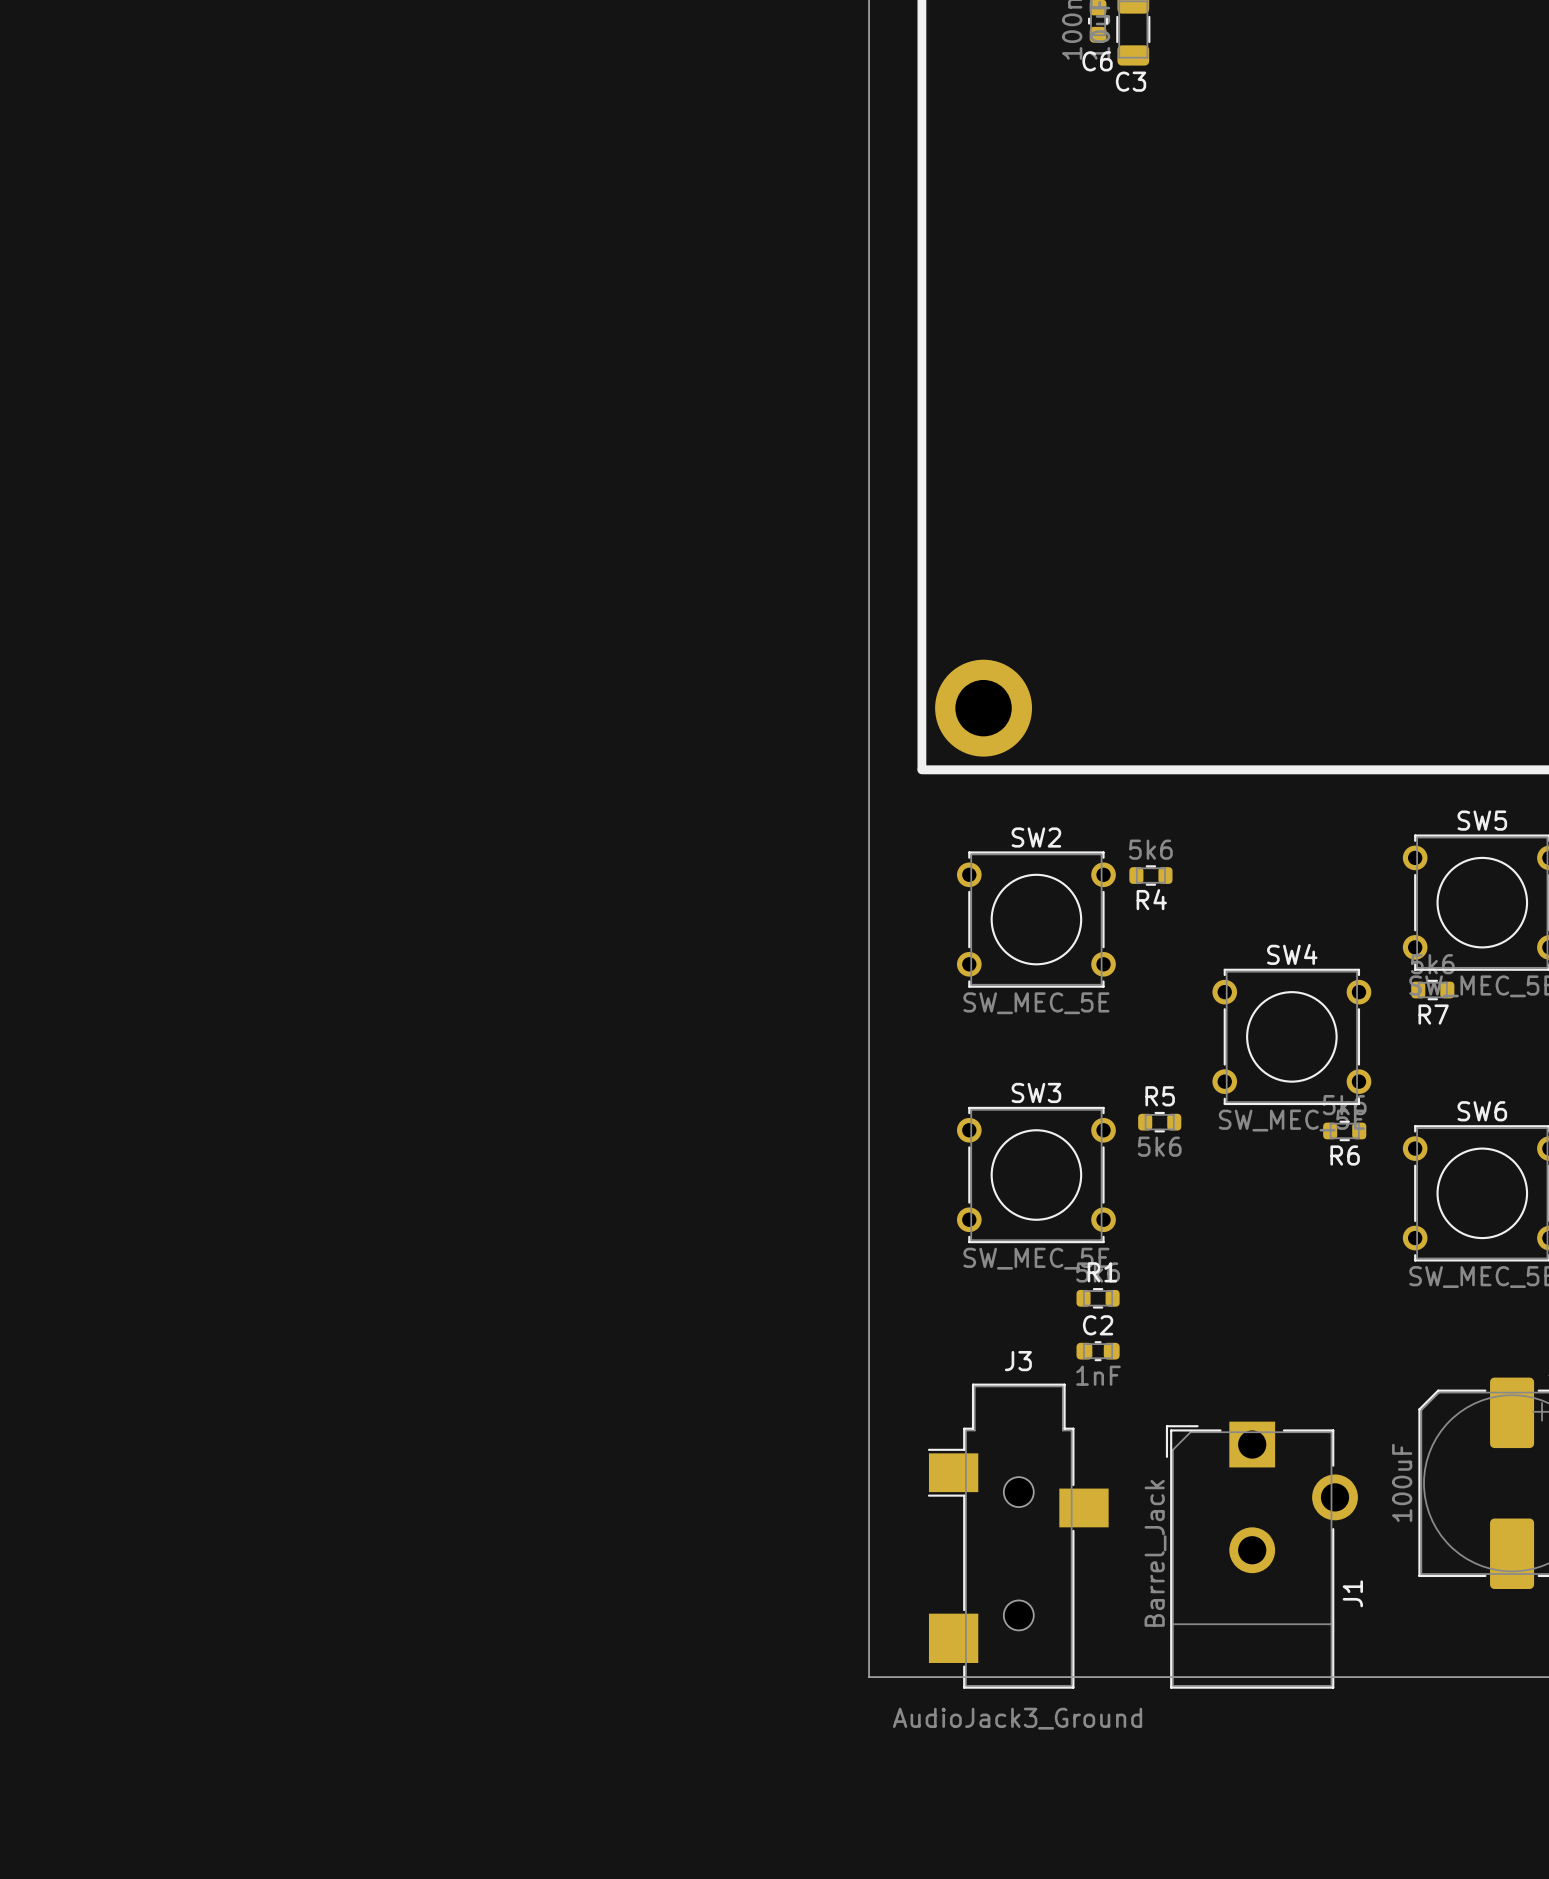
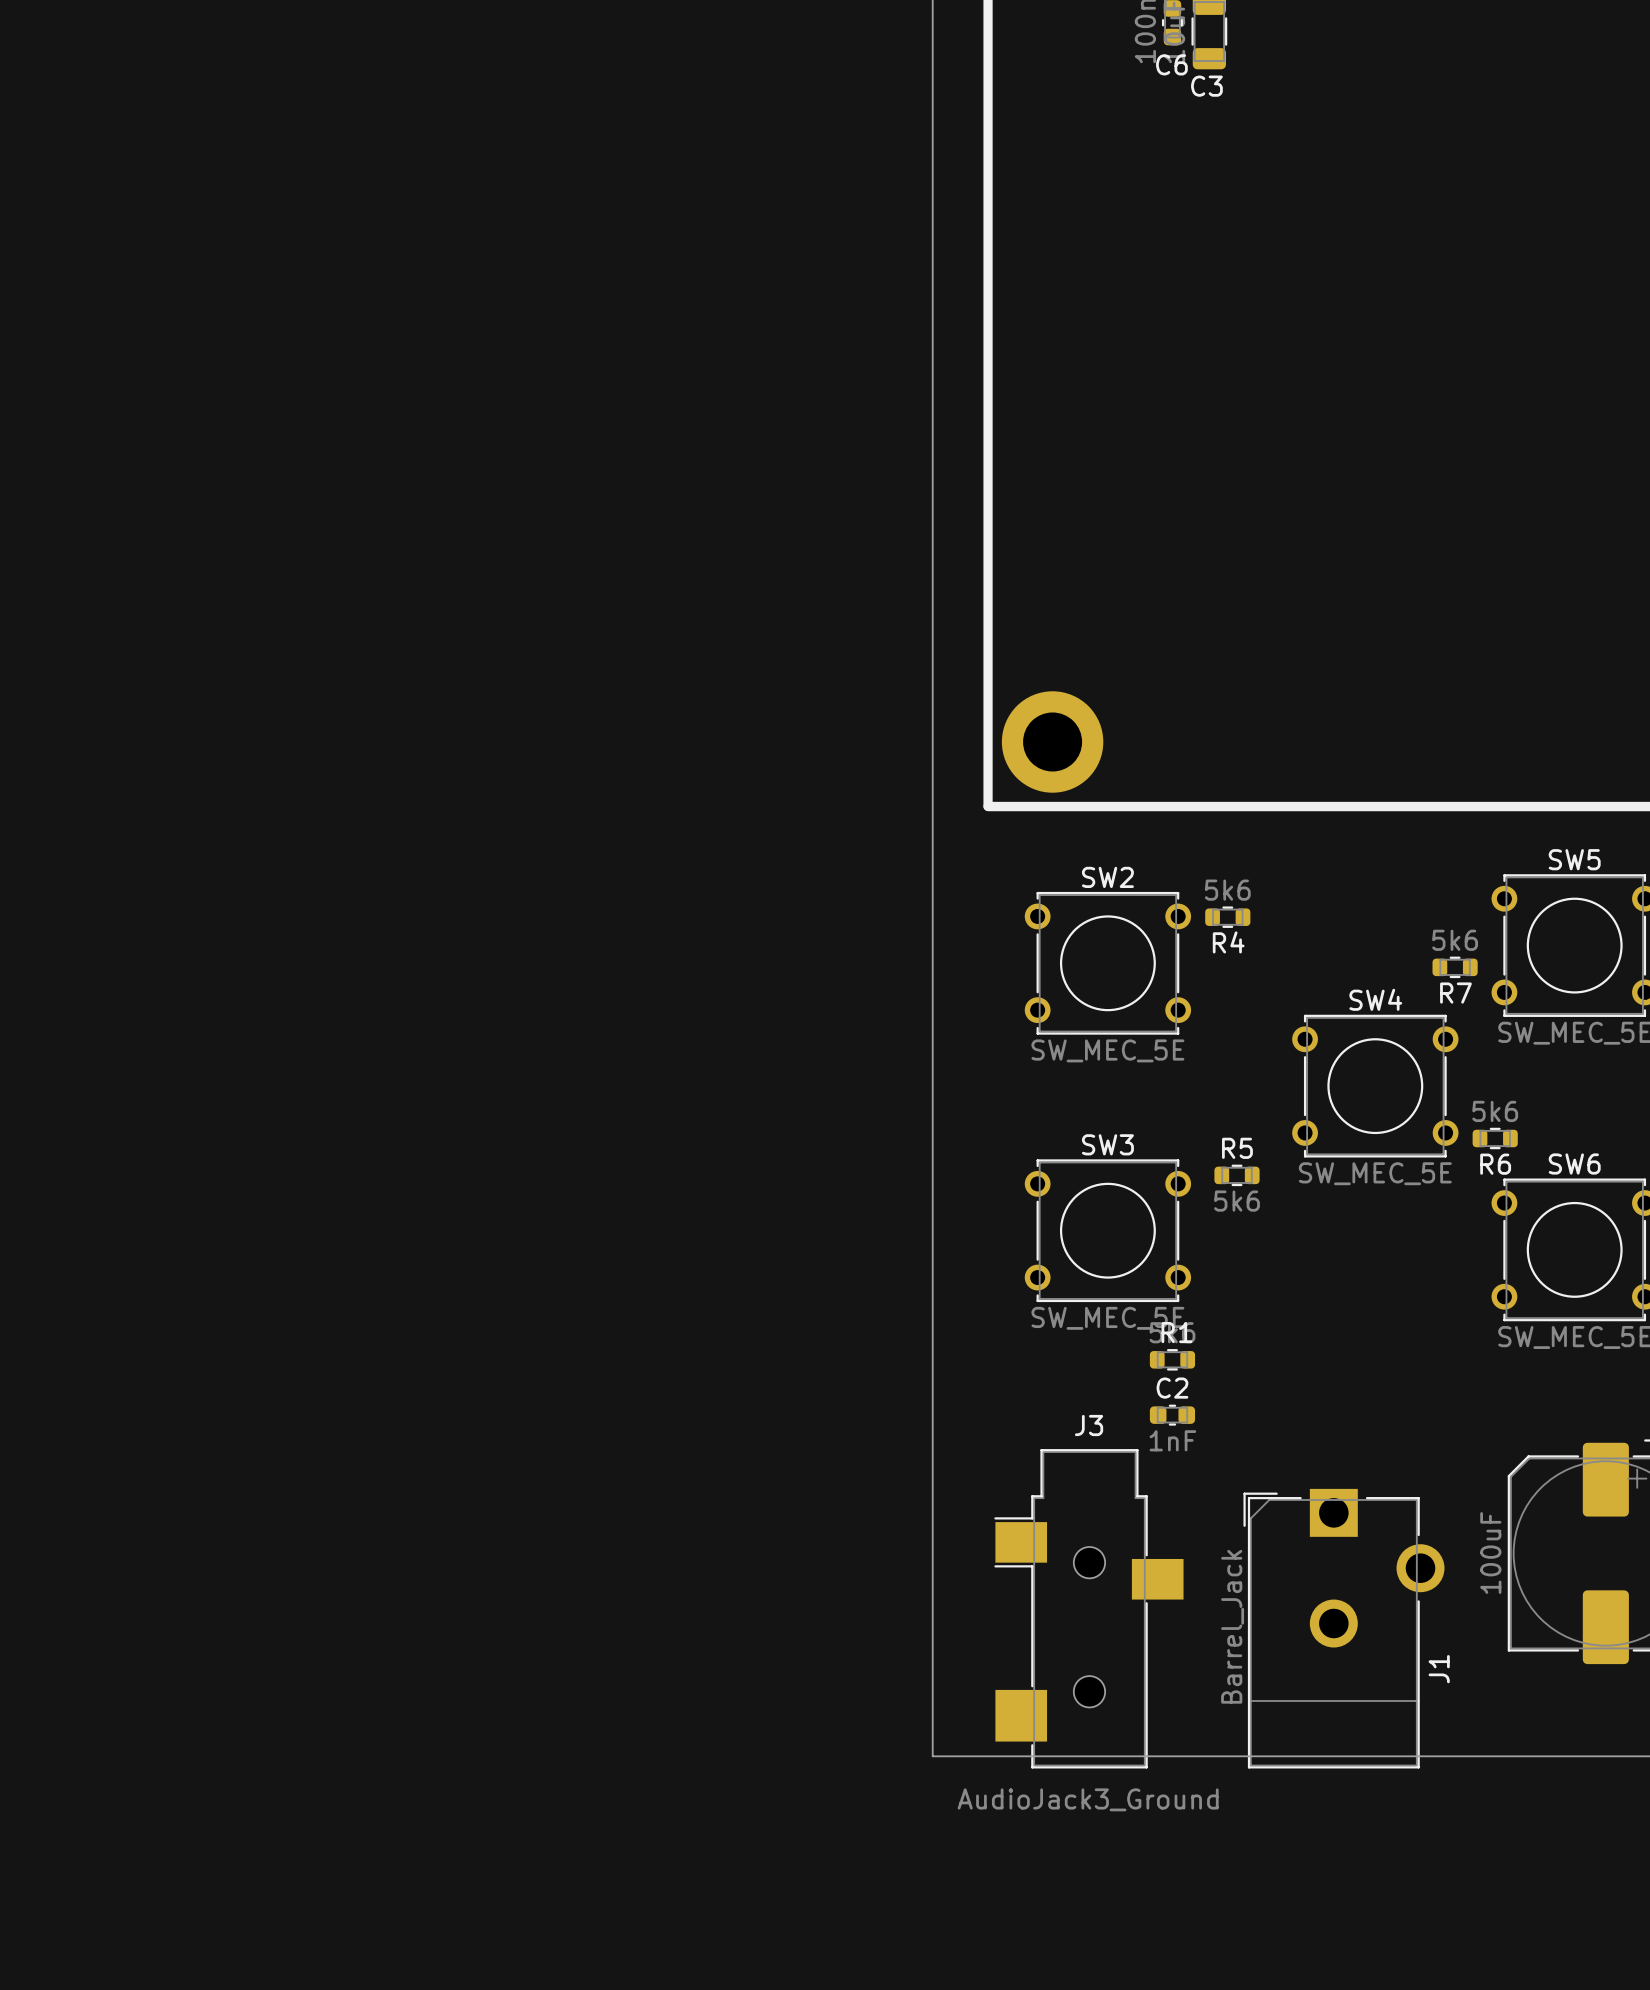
R7 position: (1432, 990) -> (1455, 967)
R6 position: (1344, 1130) -> (1495, 1138)

